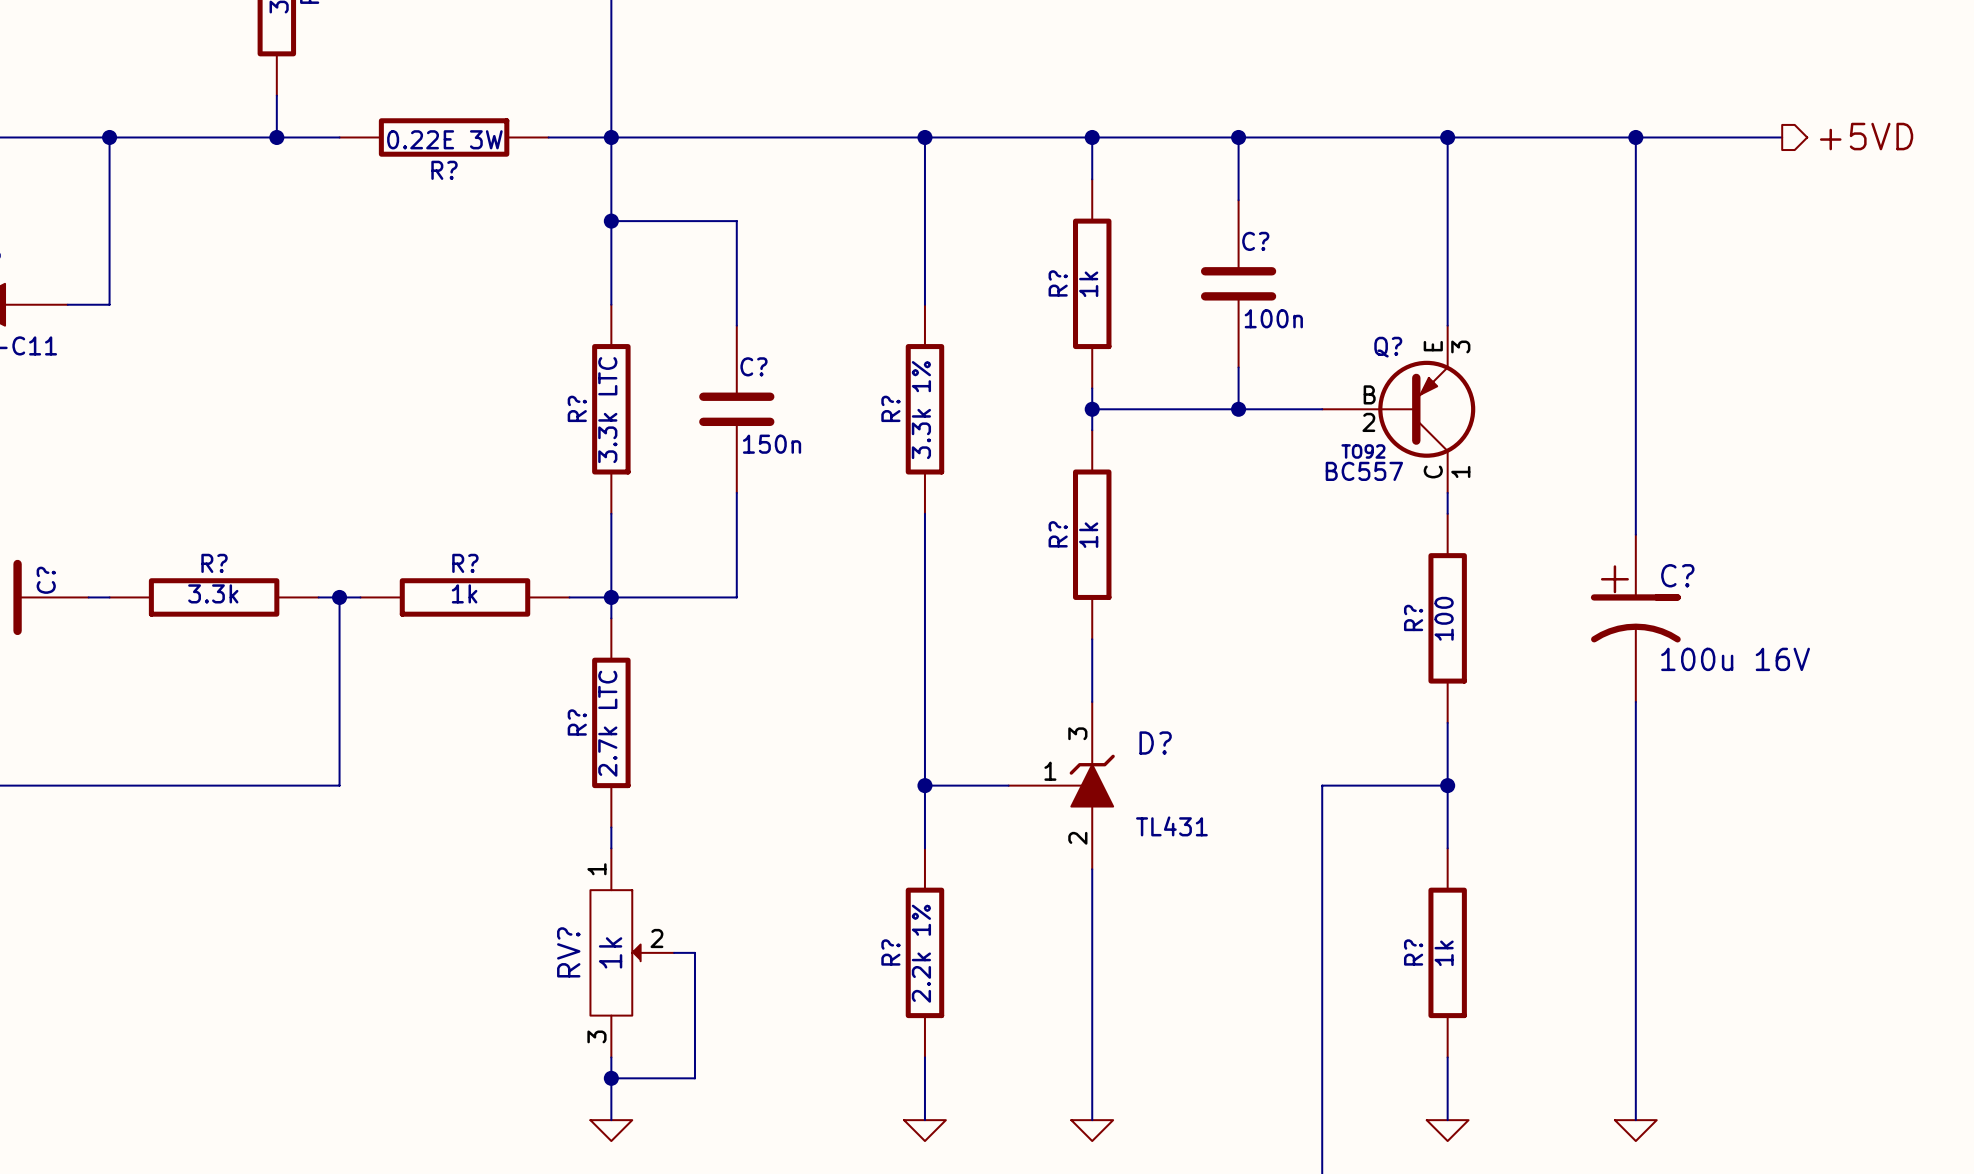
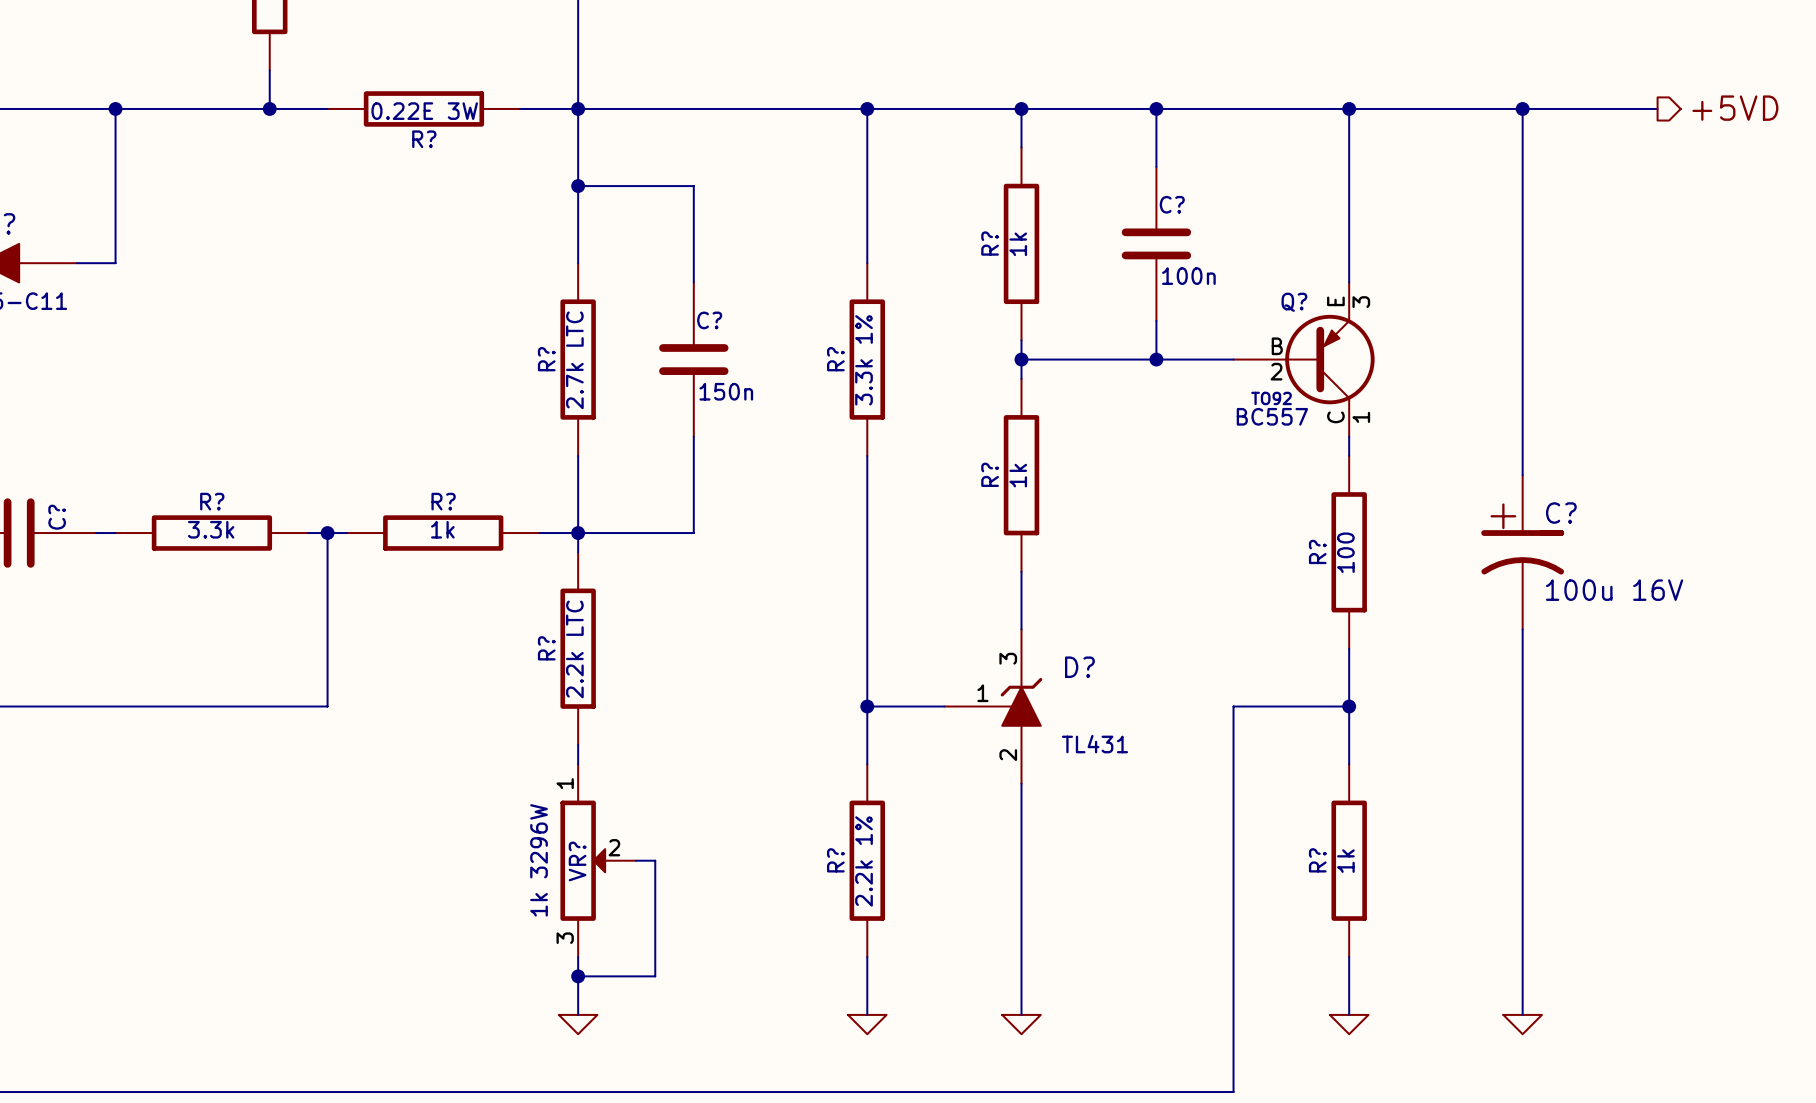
R? value: 3.3k LTC (607, 410) -> 2.7k LTC (574, 360)
R? value: 2.7k LTC (607, 723) -> 2.2k LTC (574, 649)
RV?: 1k (632, 952) -> none
VR?: none -> 1k 3296W (598, 860)

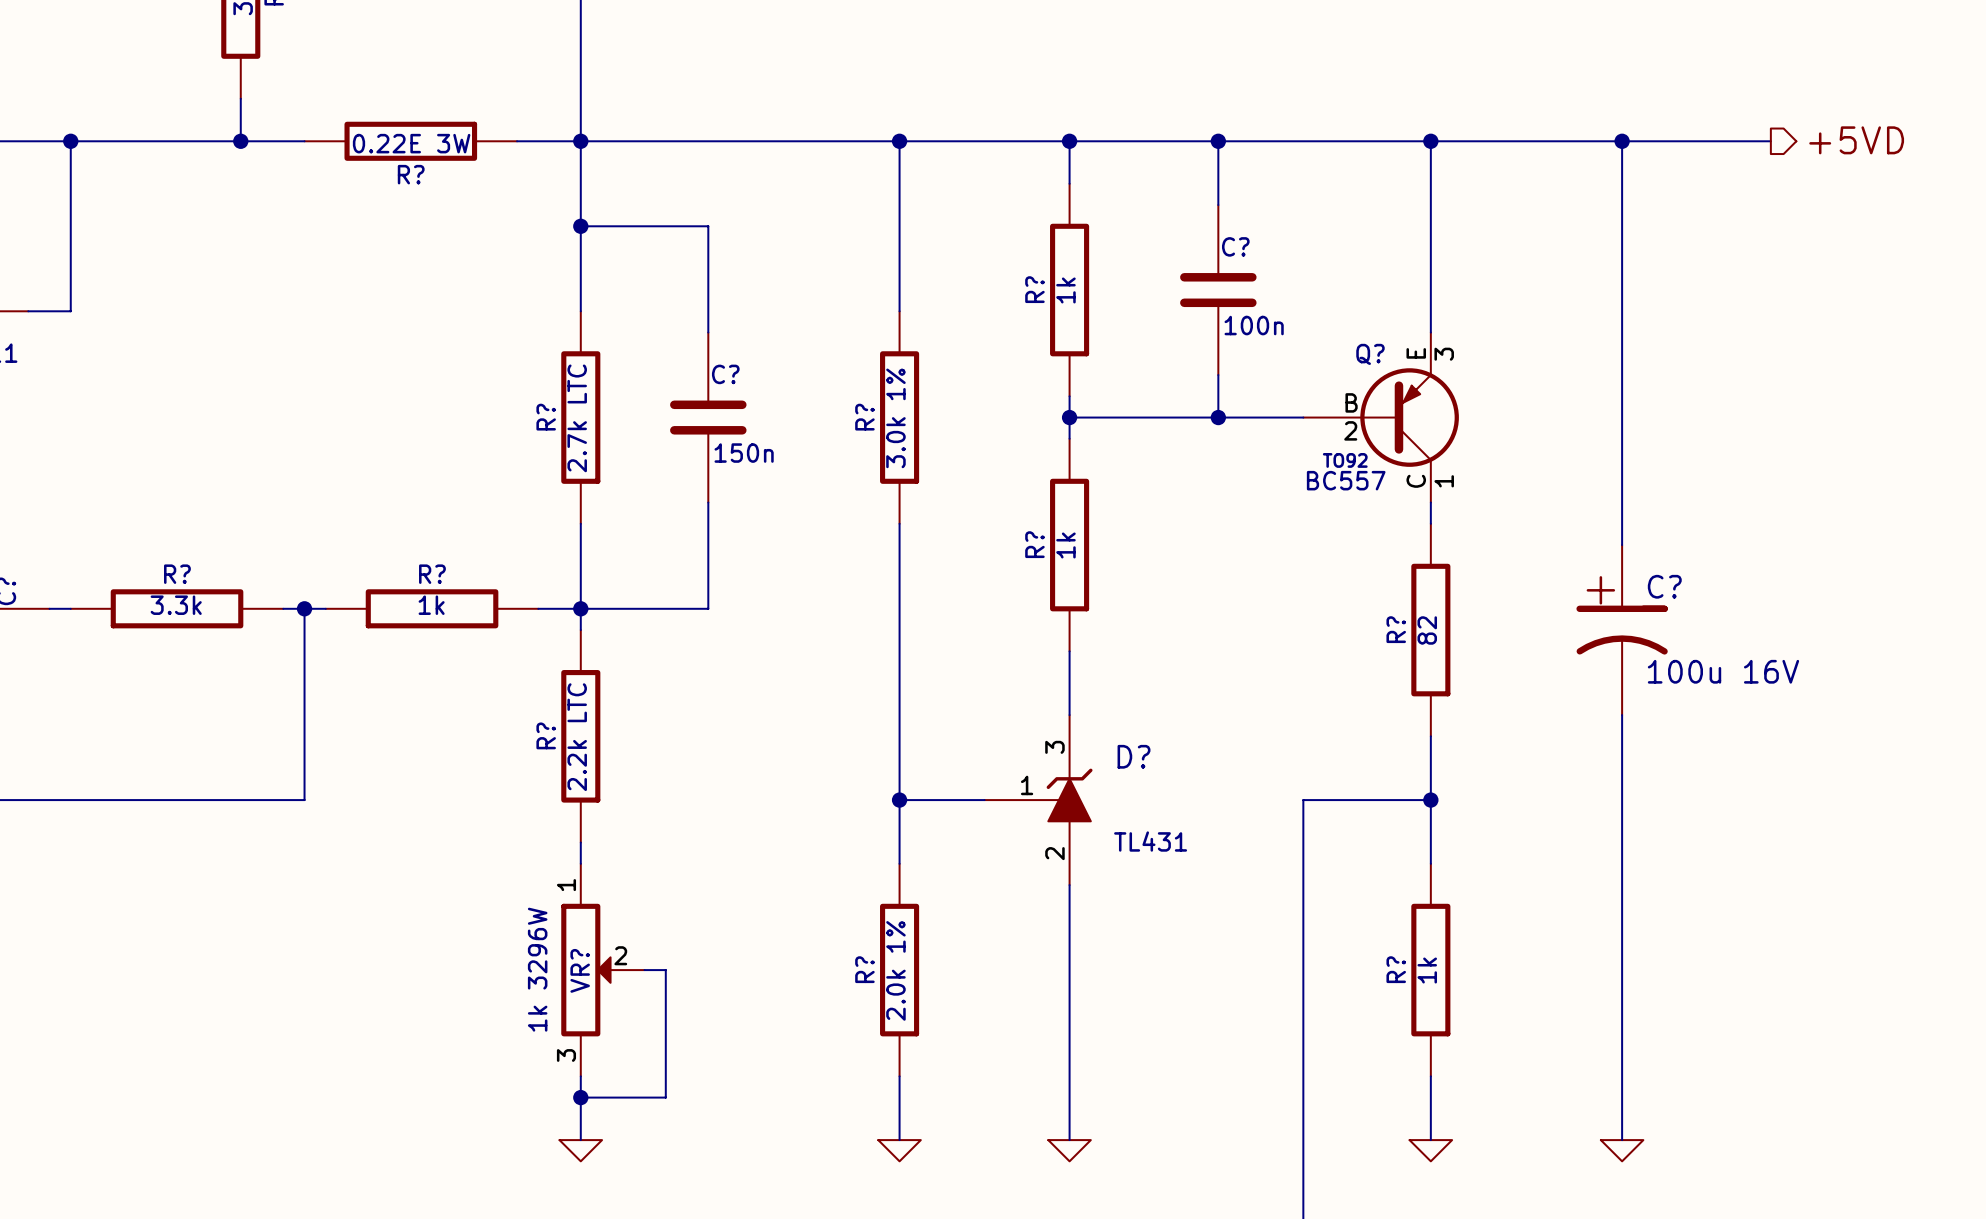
R? value: 3.3k 1% (864, 360) -> 3.0k 1% (895, 418)
R? value: 100 (1345, 552) -> 82 (1427, 630)
R? value: 2.2k 1% (864, 861) -> 2.0k 1% (895, 970)

